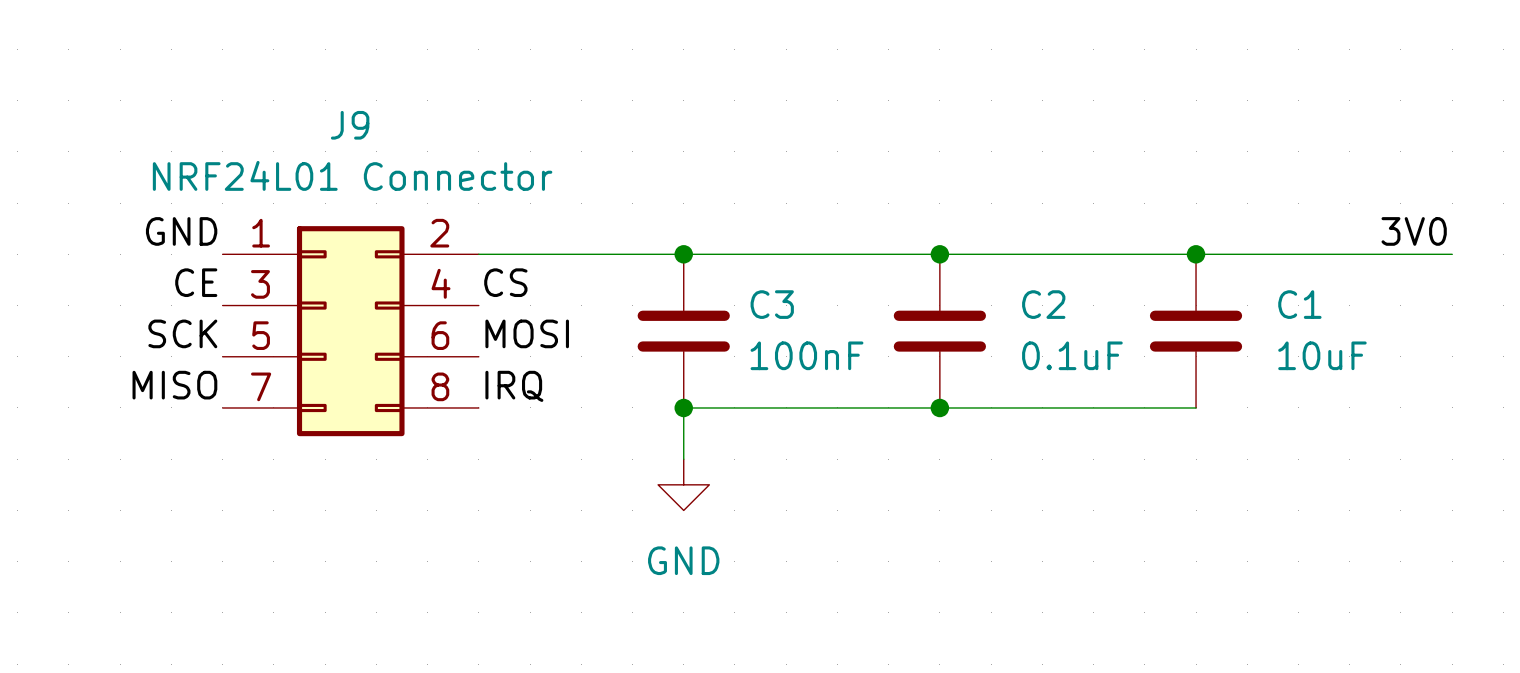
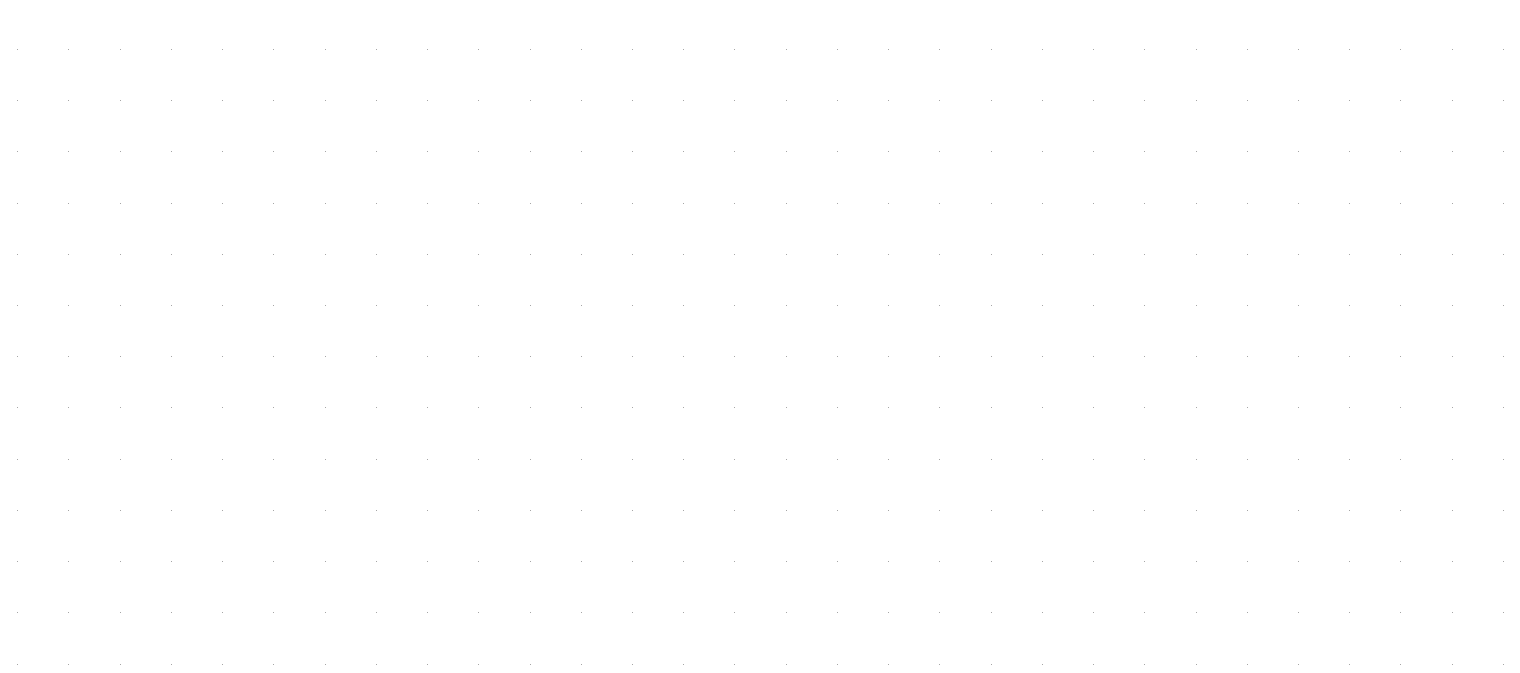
label: GND (181, 231) -> none
label: 3V0 (1414, 231) -> none
wire: (478, 254) (1452, 254) -> none
junction: (683, 254) -> none
junction: (939, 254) -> none
junction: (1196, 254) -> none
label: CE (196, 282) -> none
label: CS (505, 282) -> none
J9: NRF24L01 Connector (350, 331) -> none
C3: 100nF (683, 331) -> none
C2: 0.1uF (939, 331) -> none
C1: 10uF (1196, 331) -> none
label: SCK (182, 333) -> none
label: MOSI (527, 333) -> none
label: MISO (174, 385) -> none
label: IRQ (514, 386) -> none
junction: (683, 407) -> none
junction: (939, 407) -> none
wire: (1196, 407) (683, 407) (683, 459) -> none
power symbol: GND (683, 484) -> none

